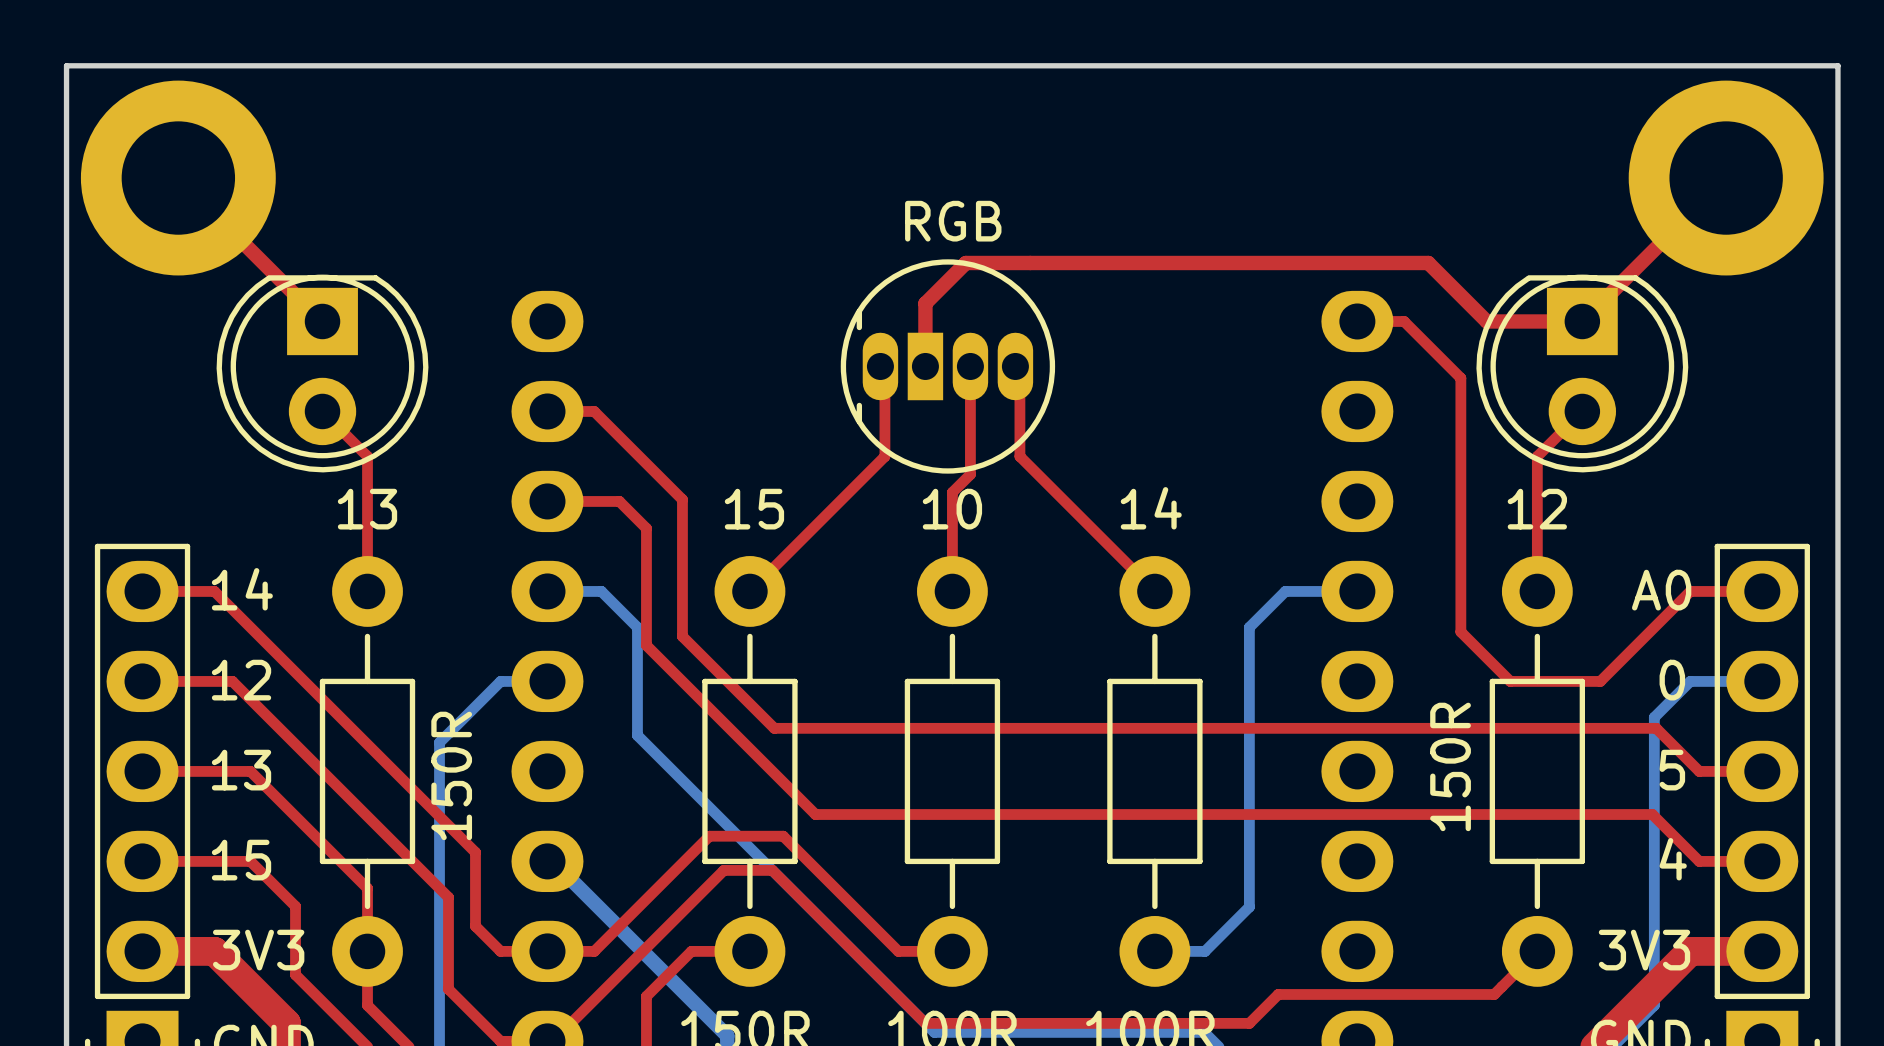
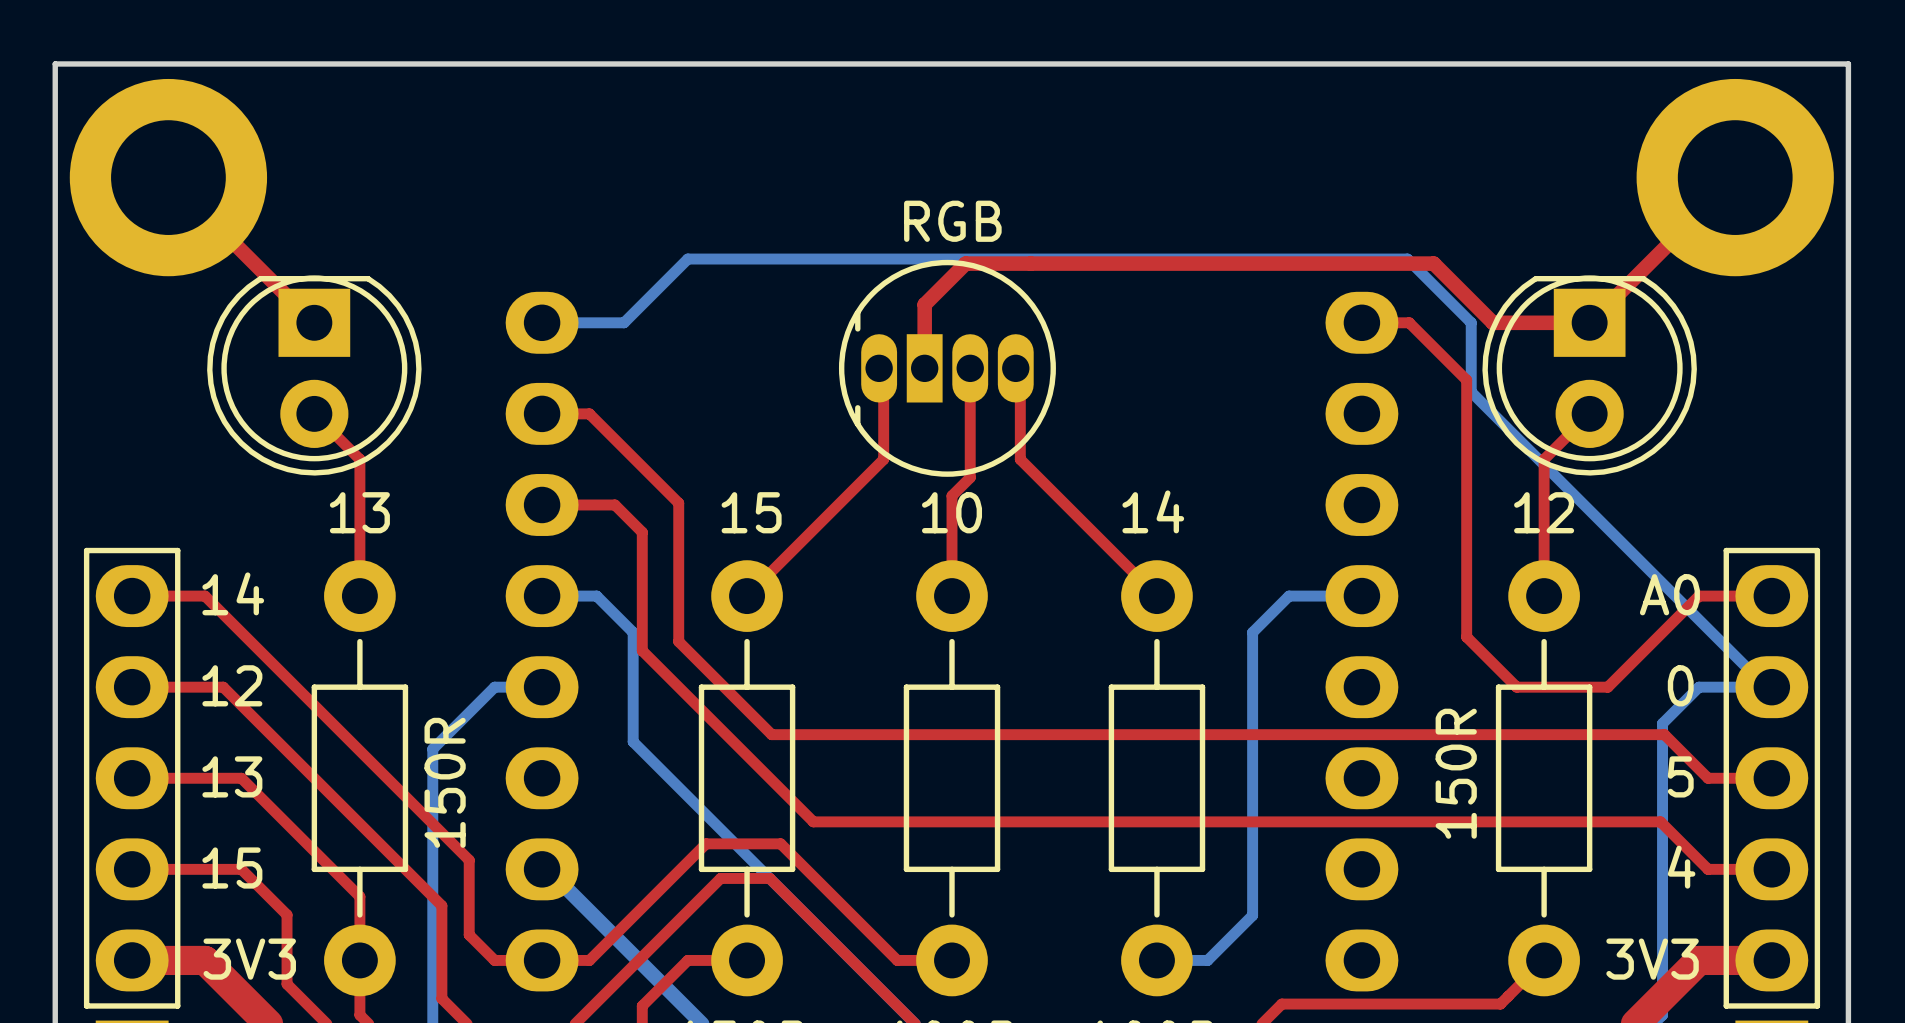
bottom track: none -> (542, 322) (624, 322) (687, 259) (1407, 259) (1471, 322) (1471, 392) (1766, 687)

